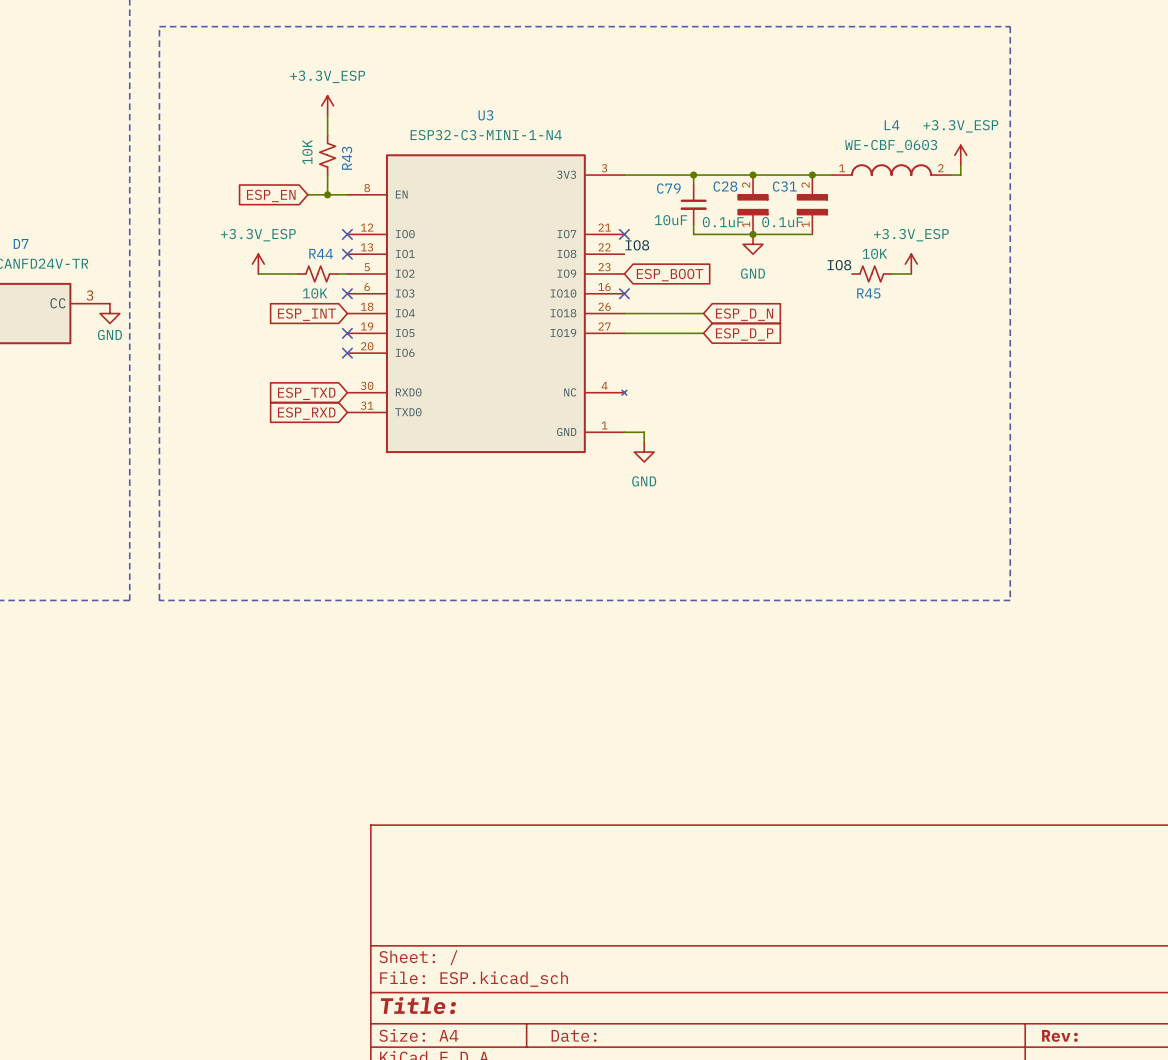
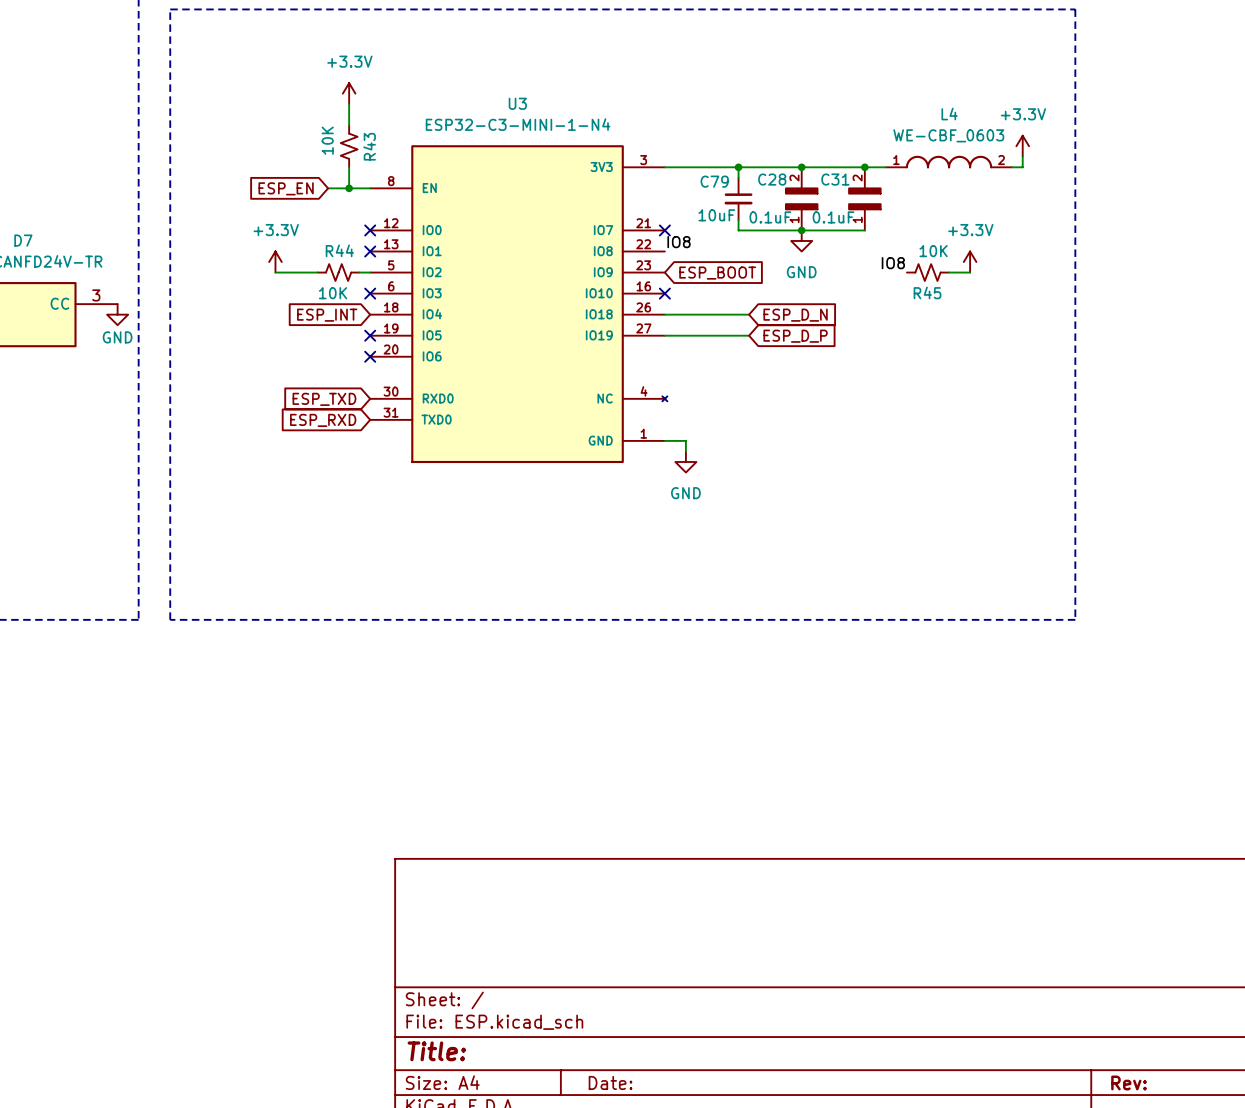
power symbol: +3.3V_ESP (327, 105) -> +3.3V (349, 93)
power symbol: +3.3V_ESP (960, 155) -> +3.3V (1022, 146)
power symbol: +3.3V_ESP (258, 264) -> +3.3V (275, 262)
power symbol: +3.3V_ESP (911, 264) -> +3.3V (970, 262)

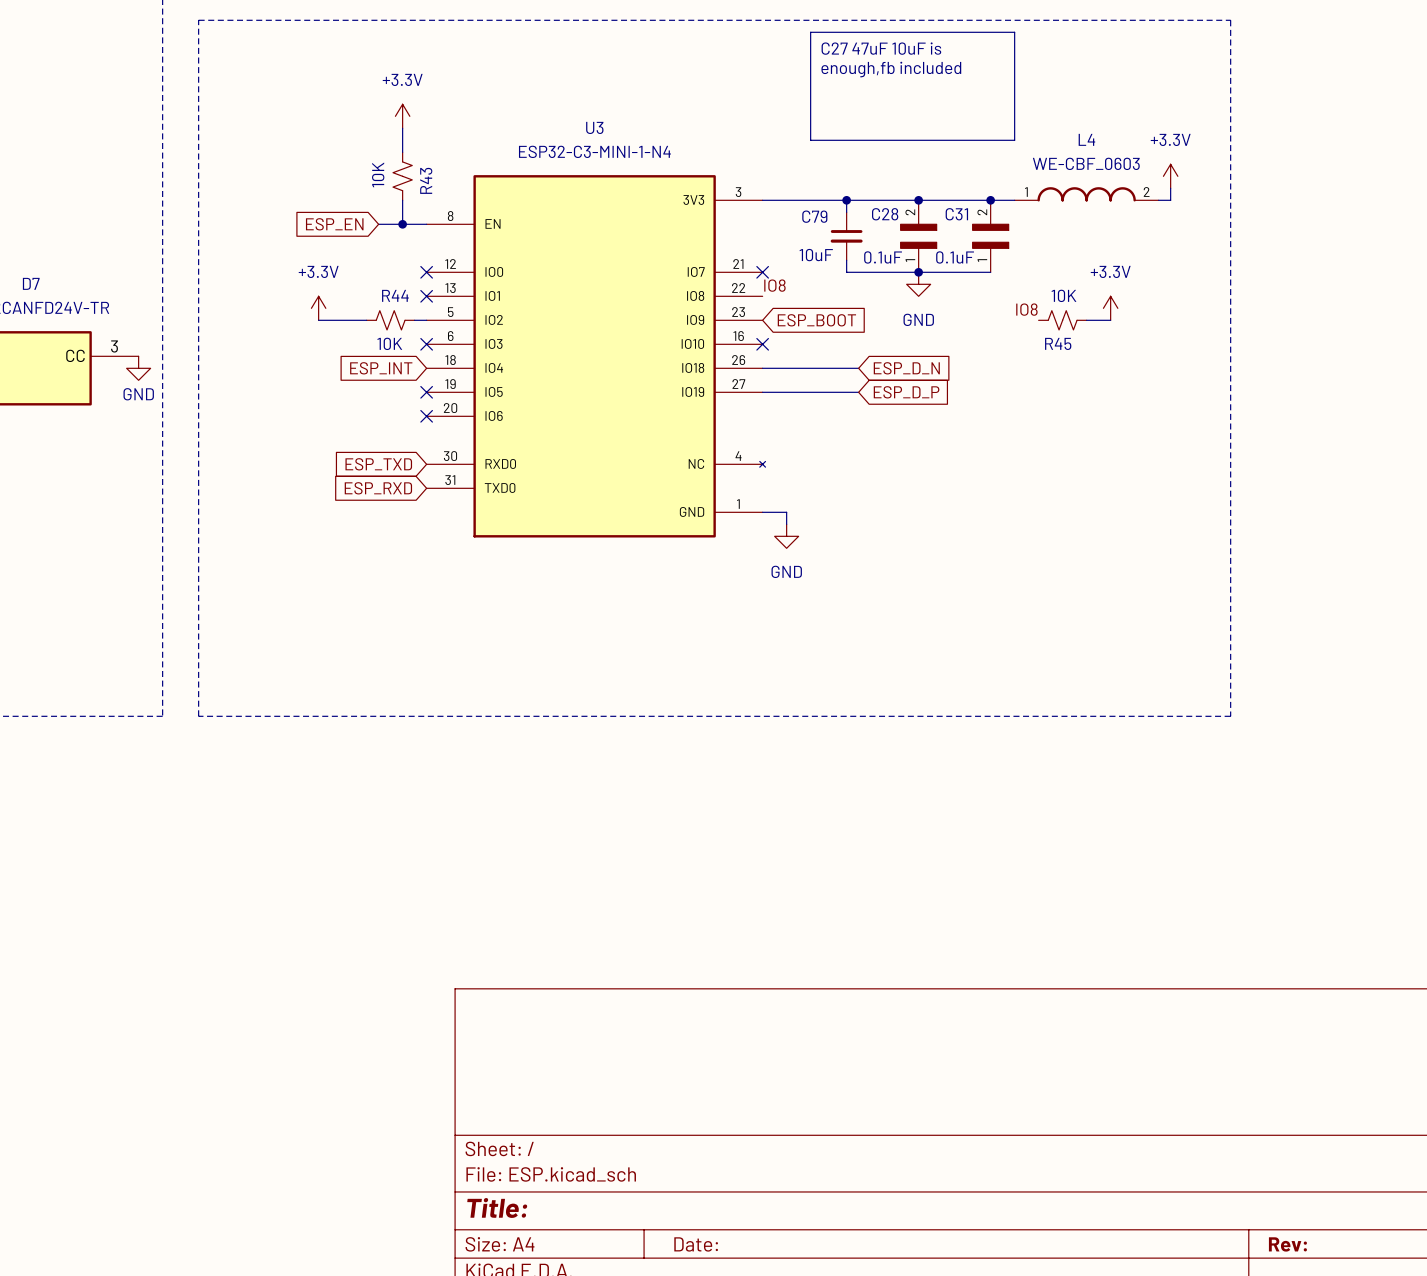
line: none -> (810, 32) (1014, 32) (1014, 140) (810, 140) (810, 32)
text: none -> C27 47uF 10uF is (881, 48)
text: none -> enough,fb included (891, 69)

